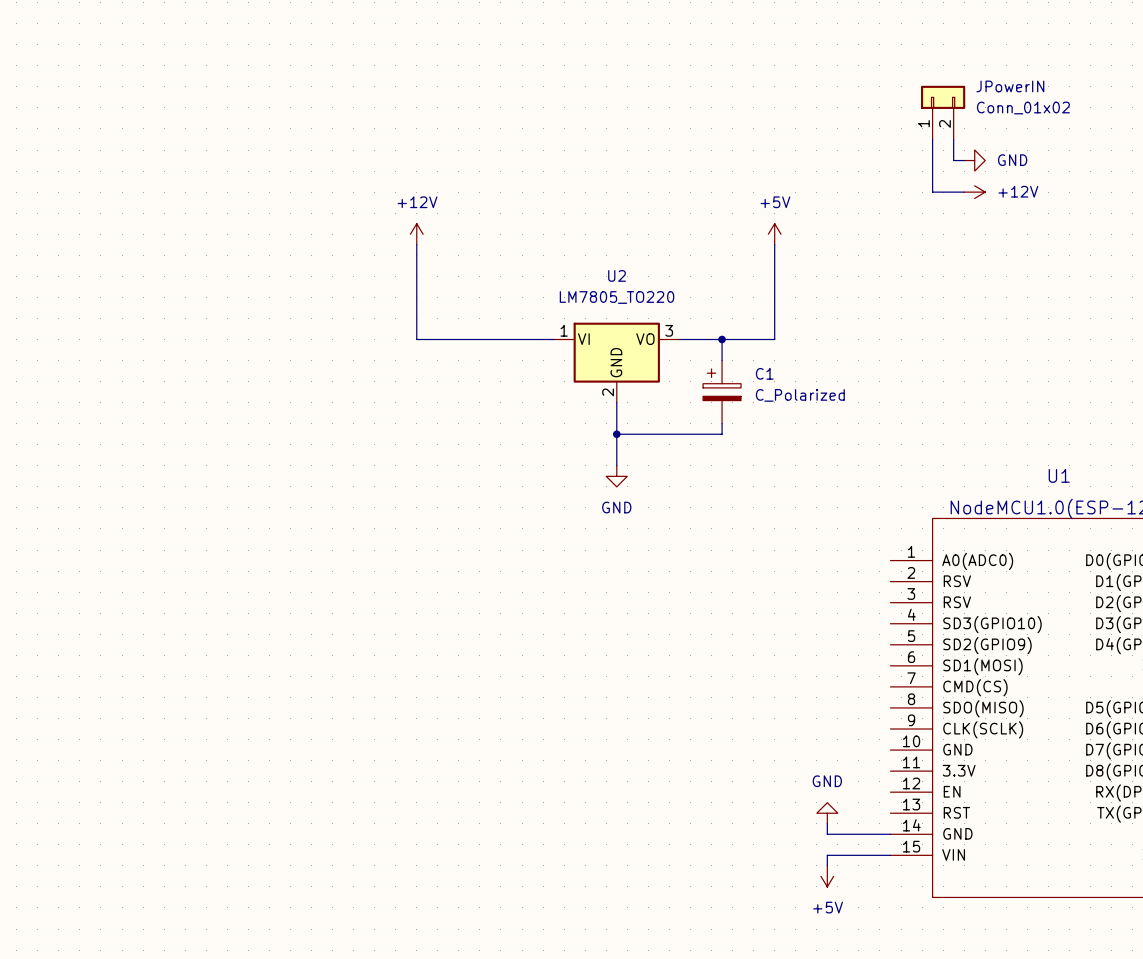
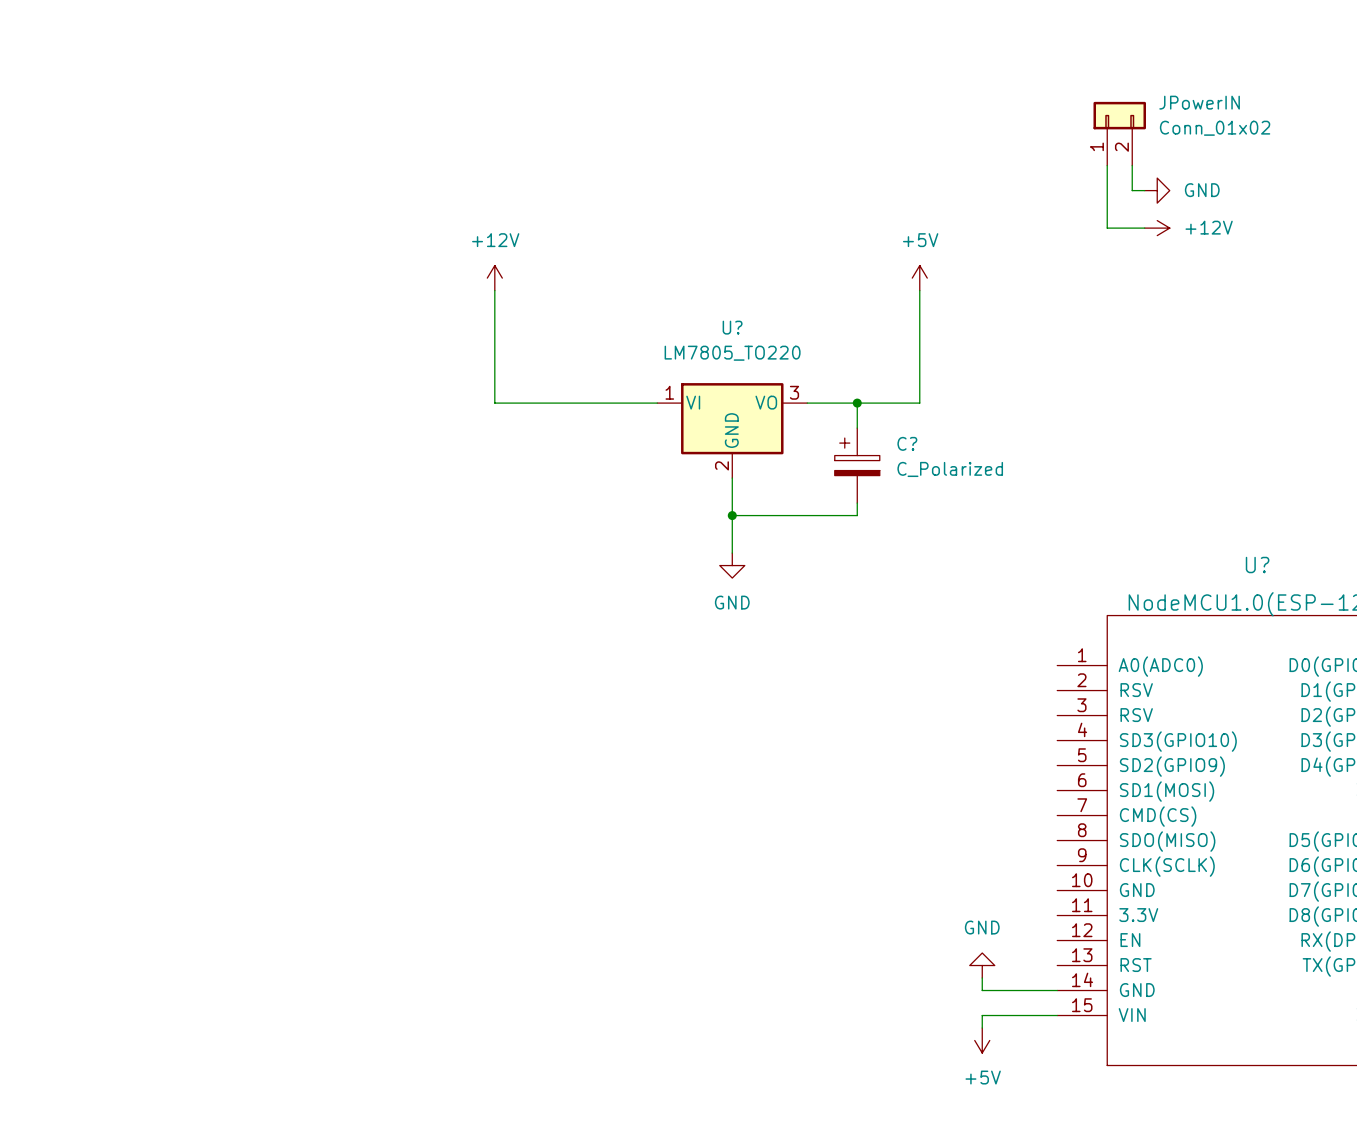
U2 name: U2 (617, 275) -> U? (732, 327)
C1 name: C1 (764, 373) -> C? (907, 443)
U1 name: U1 (1059, 475) -> U? (1257, 565)

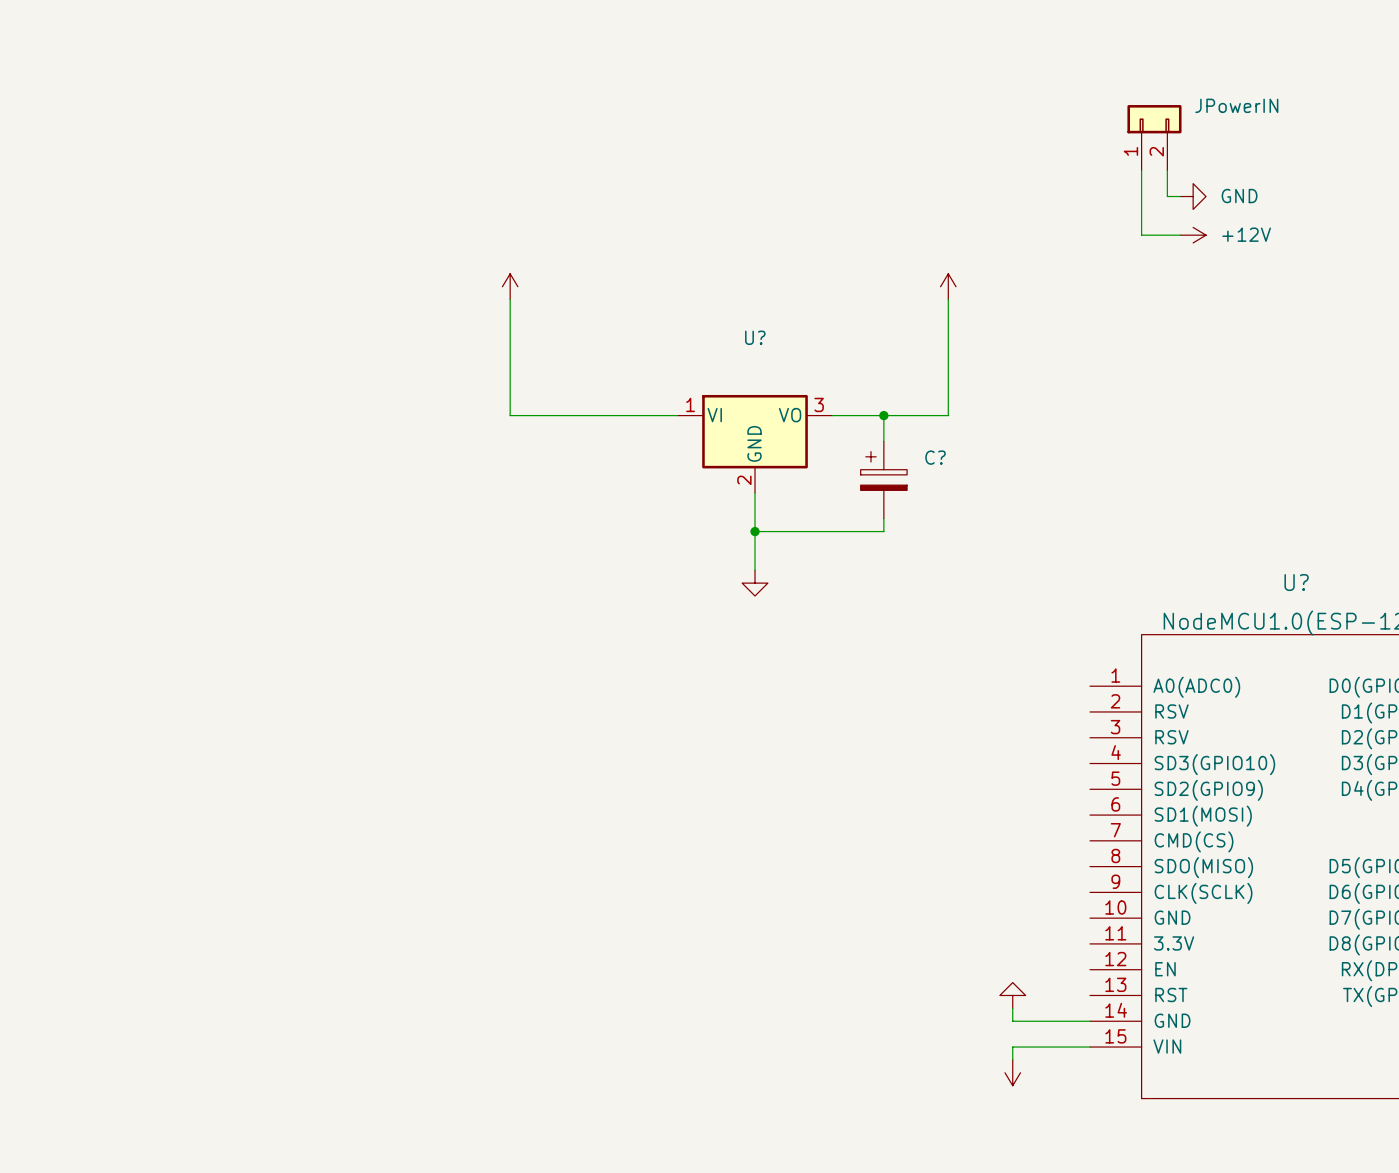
JPowerIN value: Conn_01x02 (1215, 128) -> none
power symbol text: +12V (495, 240) -> none
power symbol text: +5V (920, 240) -> none
U? value: LM7805_TO220 (732, 353) -> none
C? value: C_Polarized (950, 469) -> none
power symbol text: GND (732, 602) -> none
power symbol text: GND (982, 927) -> none
power symbol text: +5V (983, 1077) -> none

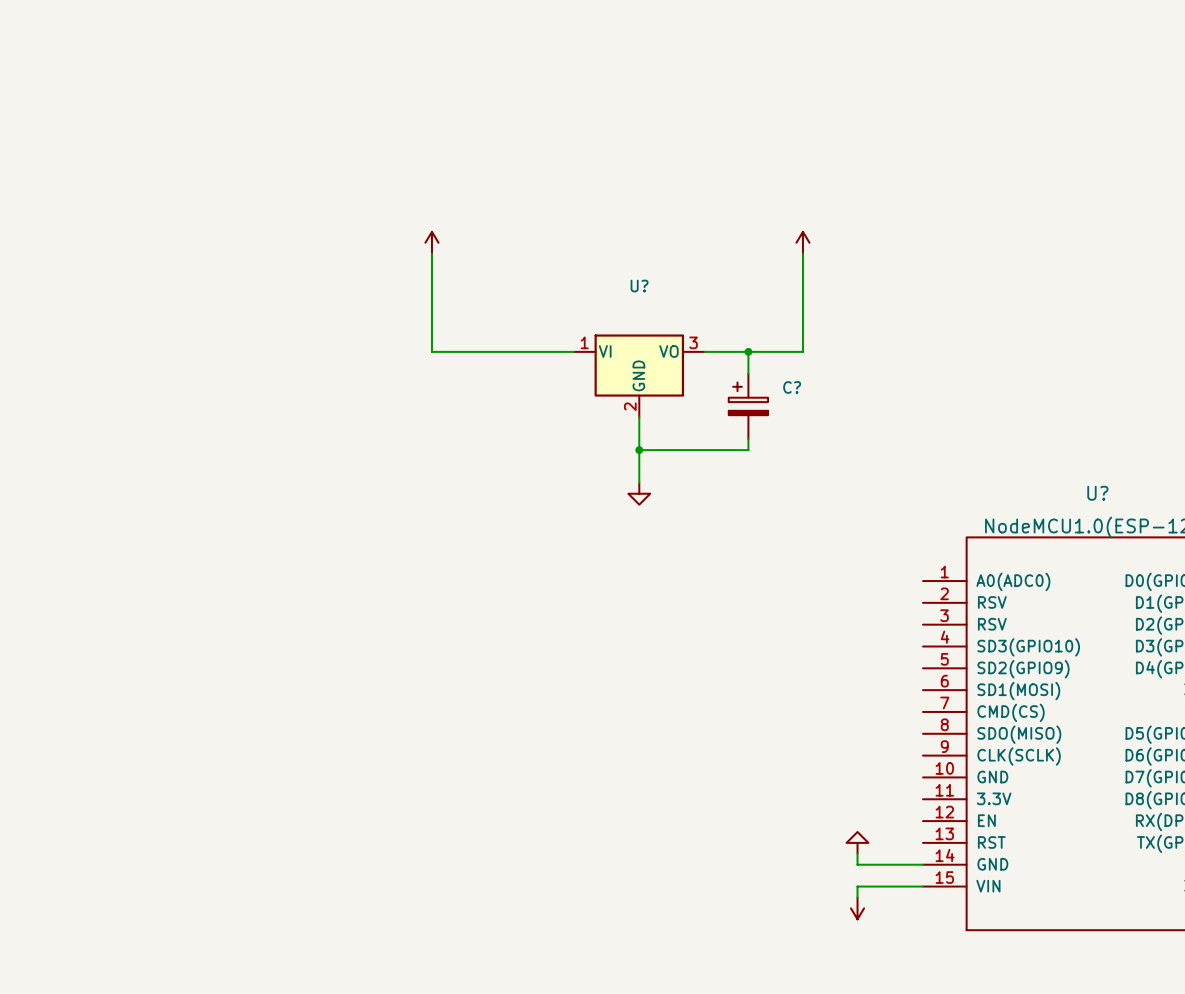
JPowerIN: (1154, 137) -> none
wire: (1141, 170) (1141, 235) (1180, 235) -> none
wire: (1167, 170) (1167, 196) (1180, 196) -> none
power symbol: GND (1193, 196) -> none
power symbol: +12V (1193, 235) -> none

